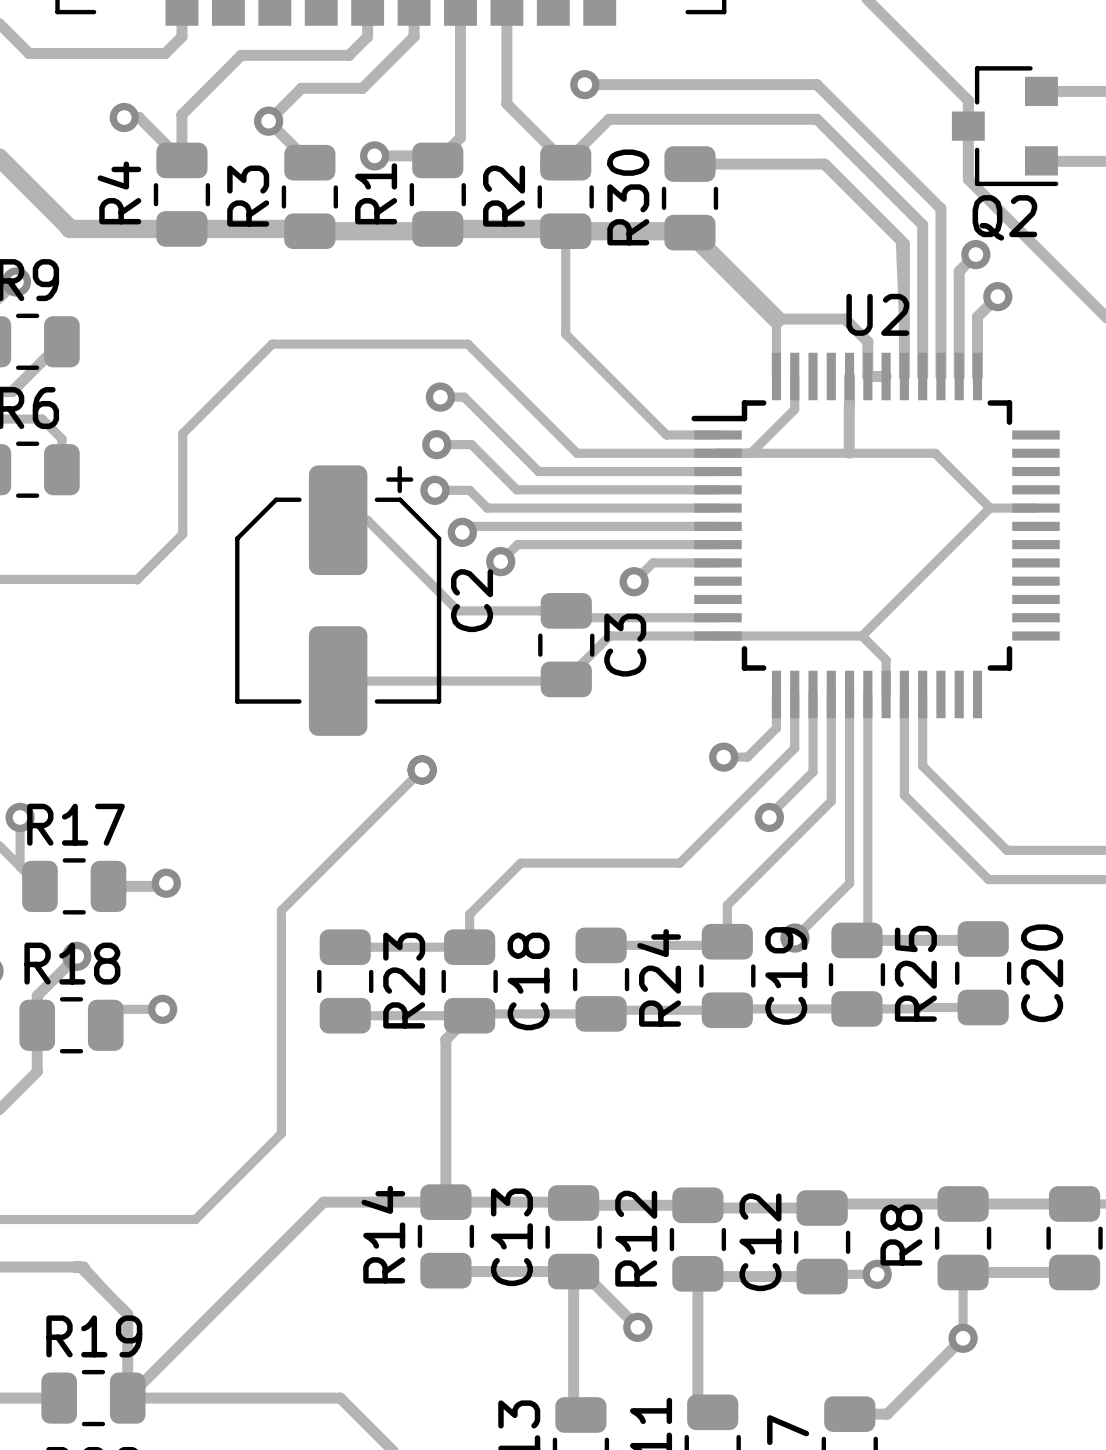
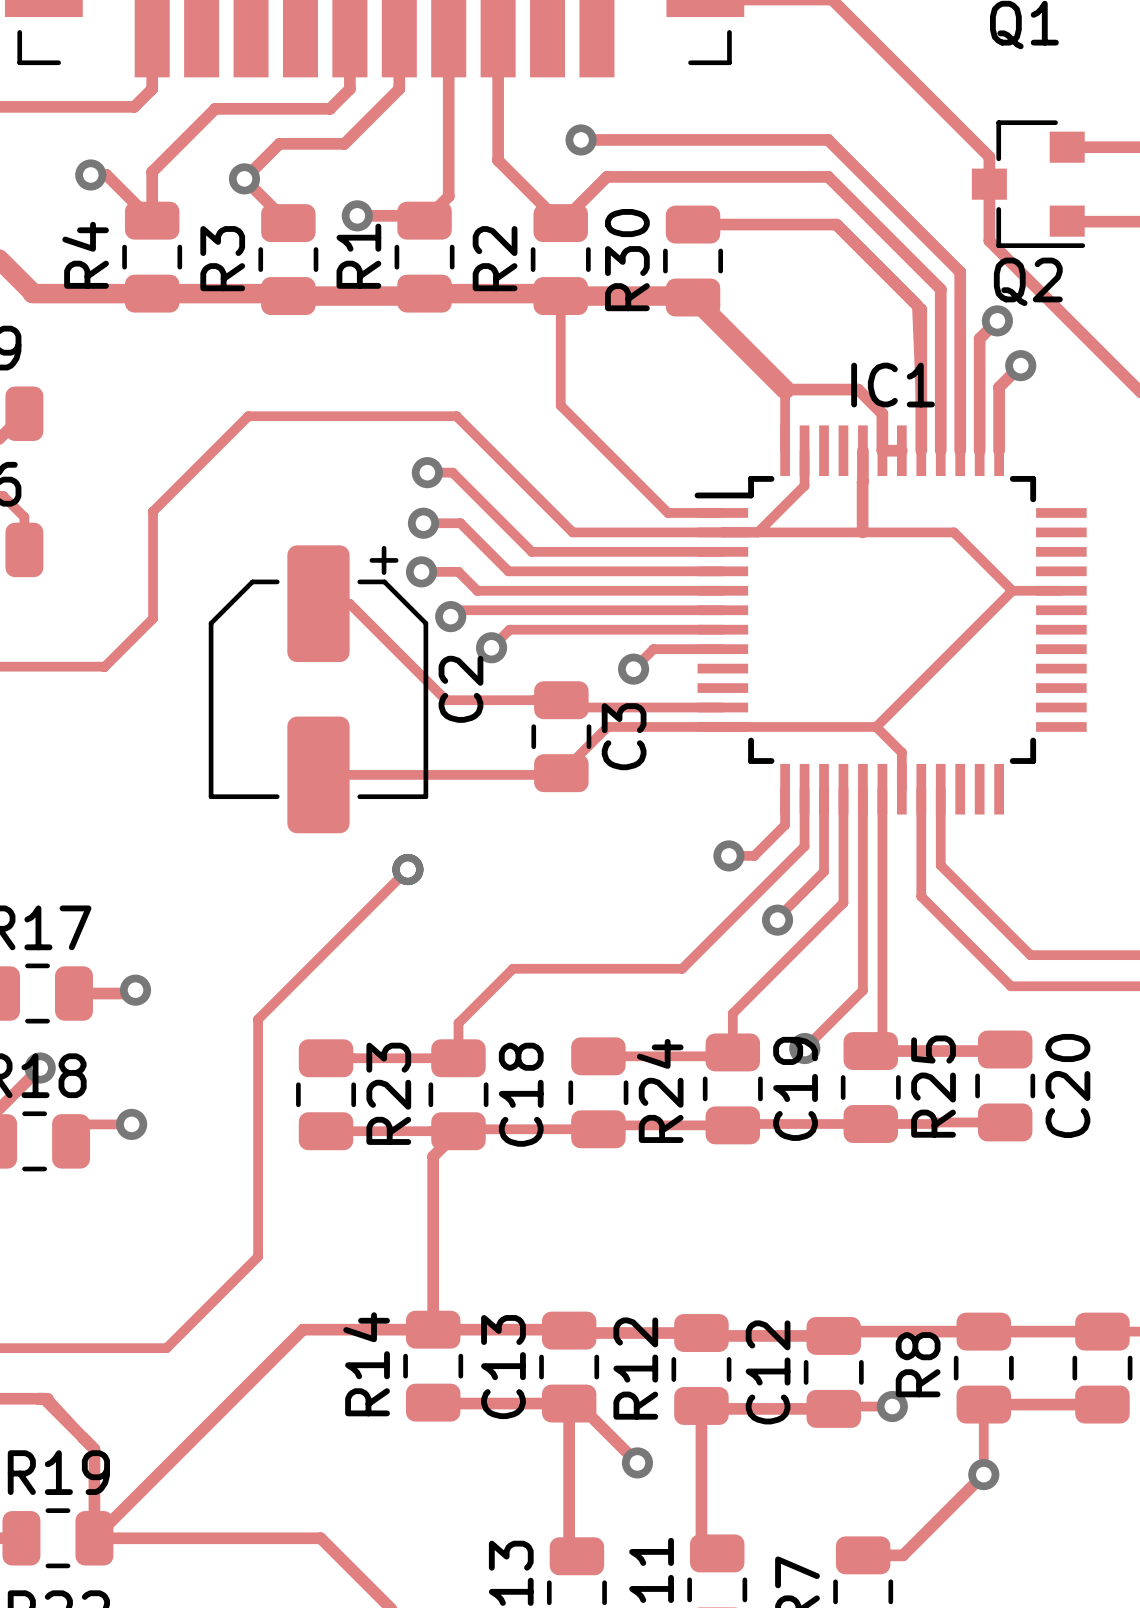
U2 name: U2 (877, 314) -> IC1 (893, 385)

